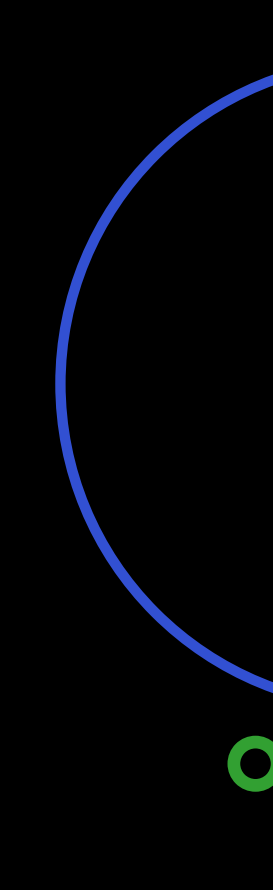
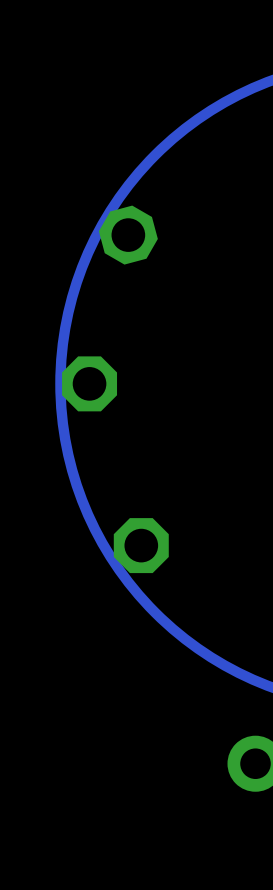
part: none -> (128, 235)
part: none -> (89, 383)
part: none -> (141, 545)

